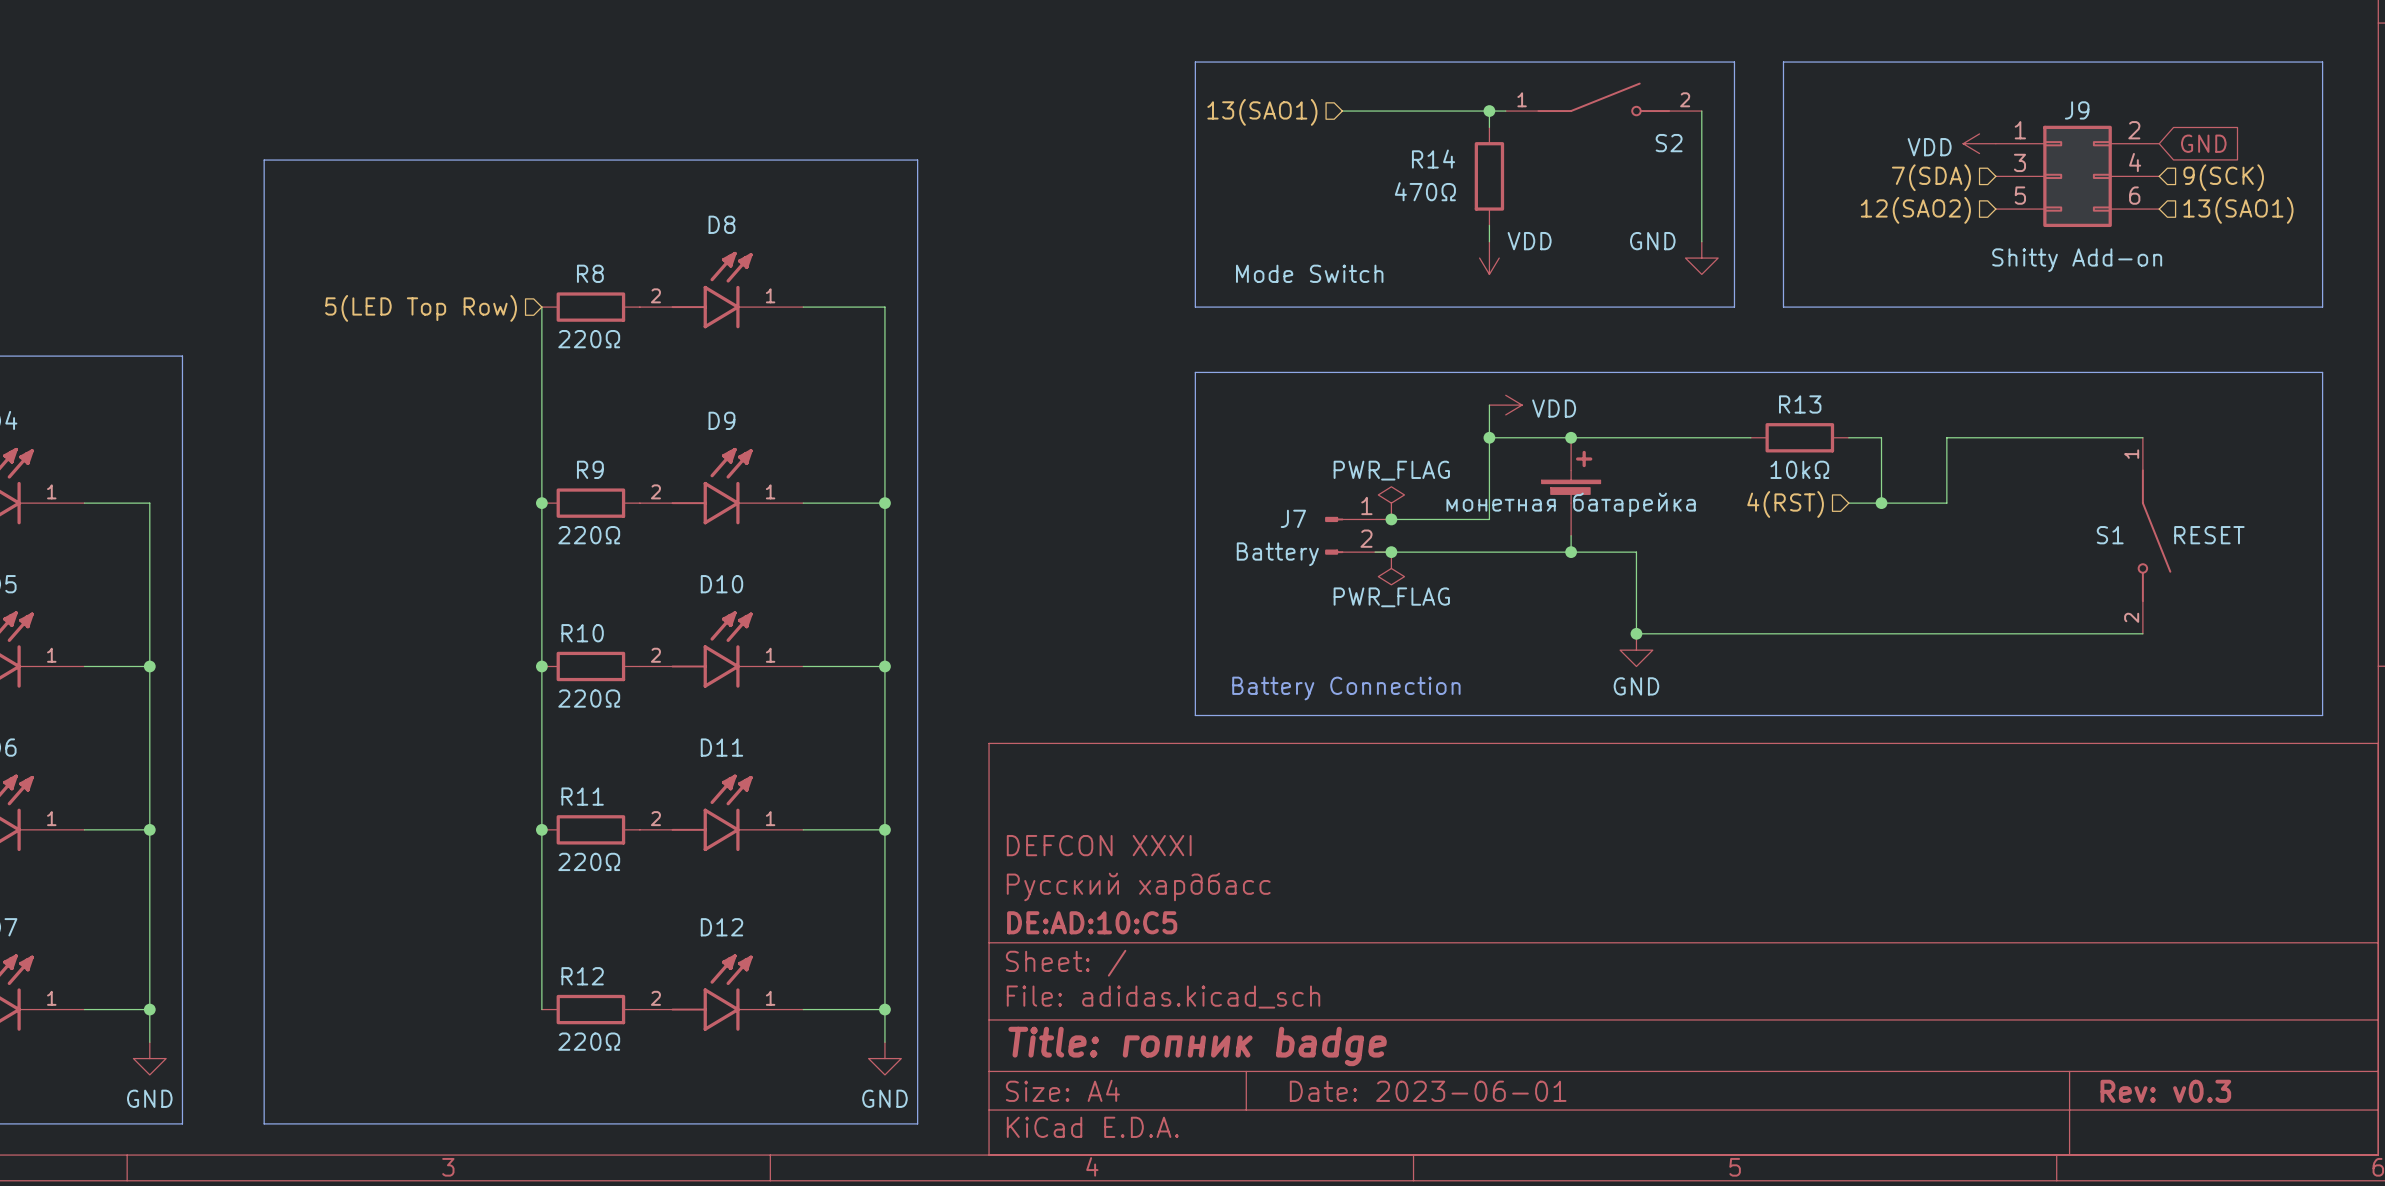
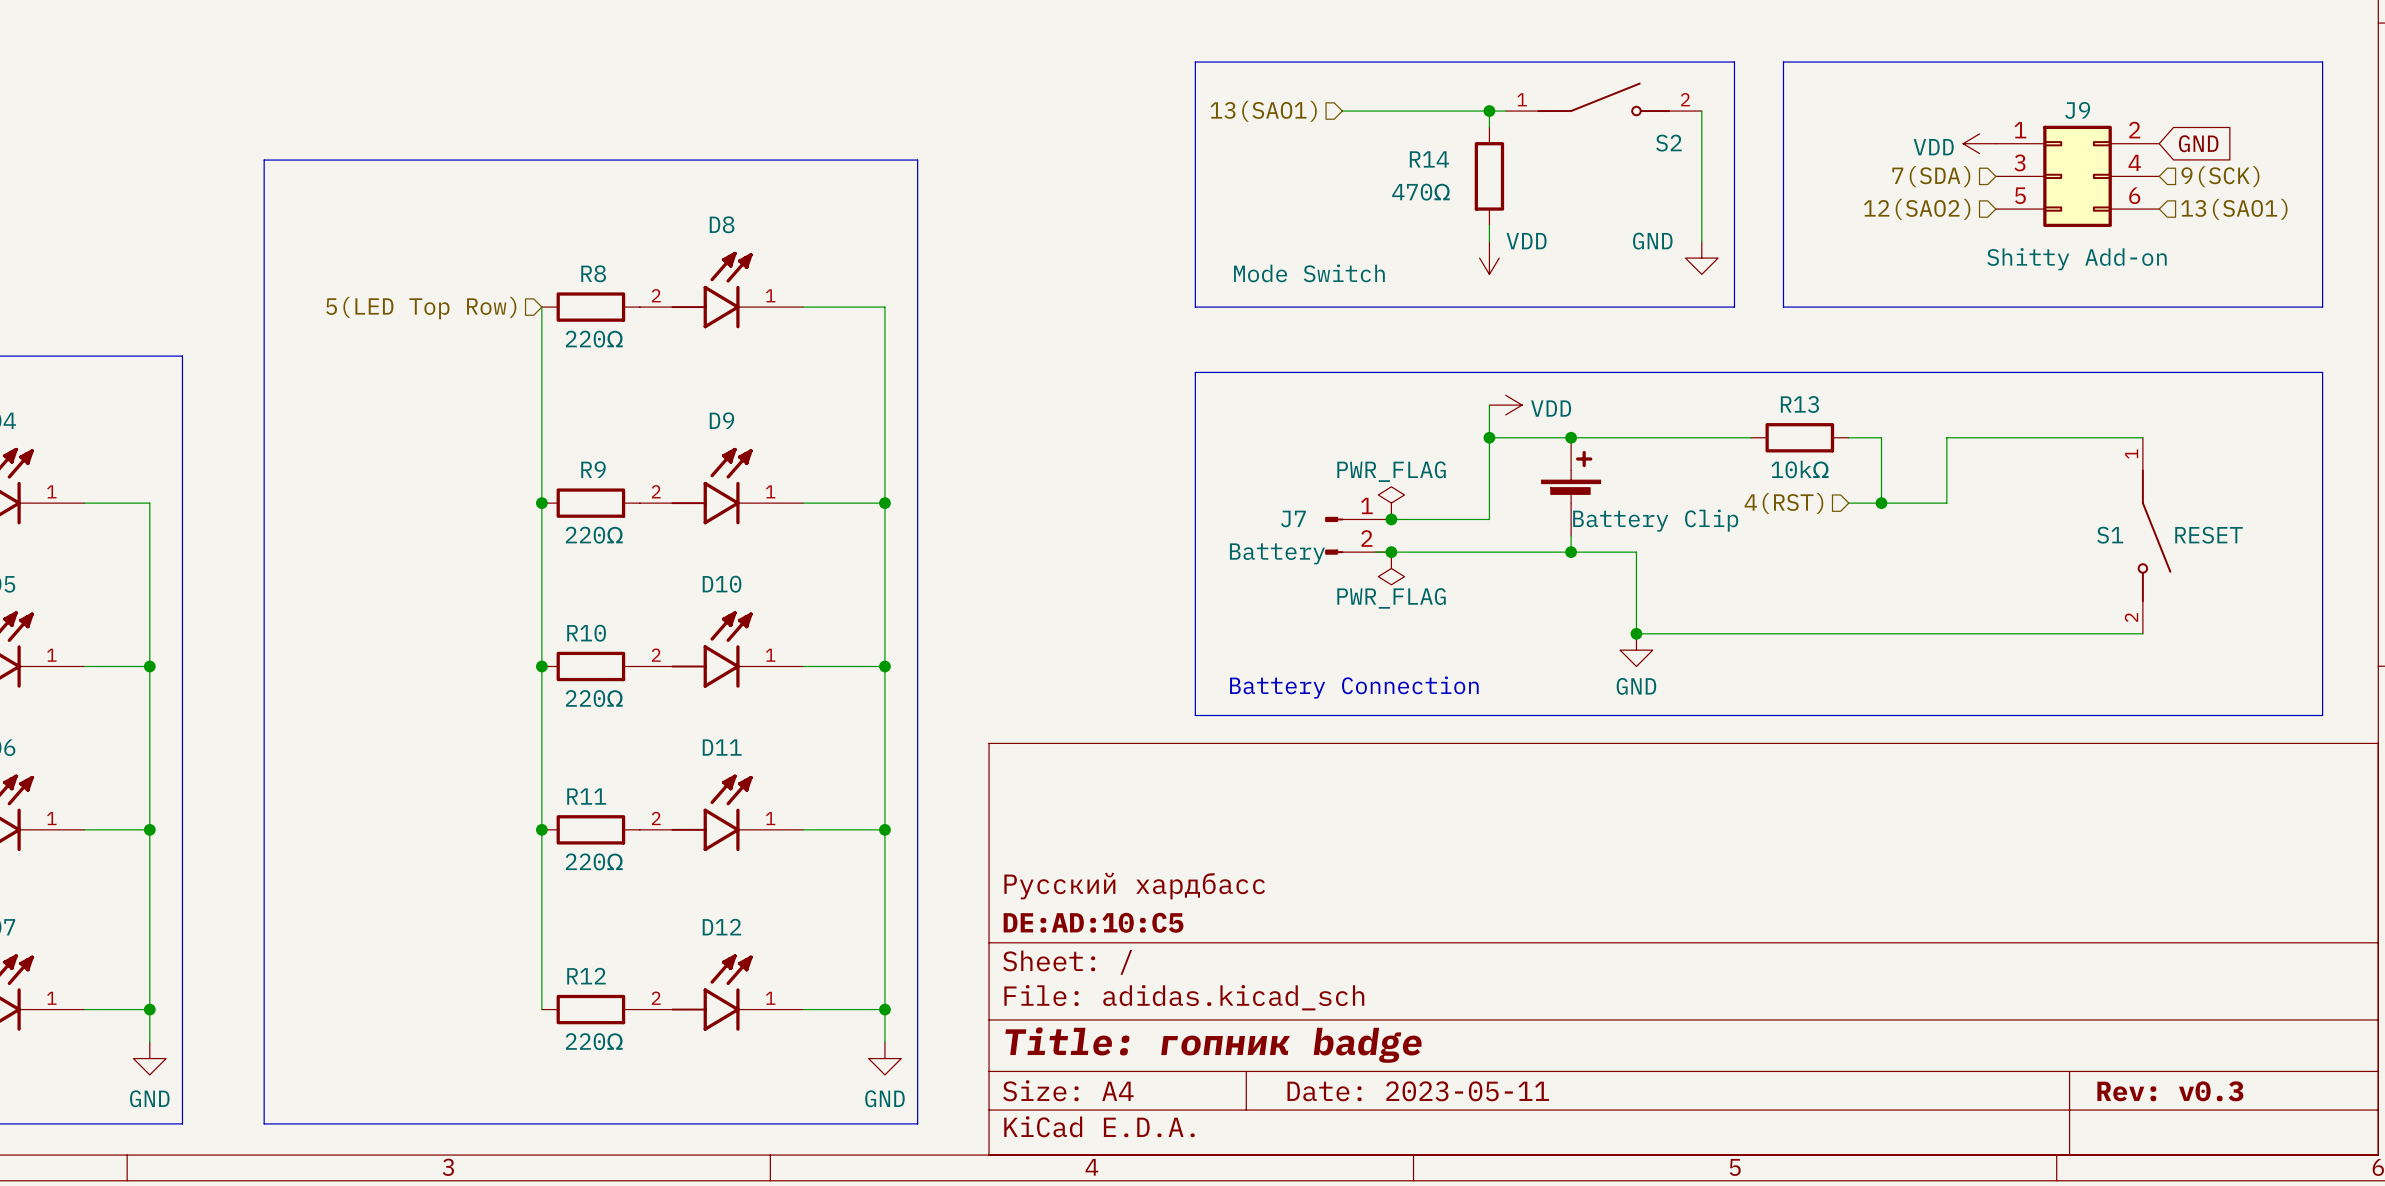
part text: монетная батарейка (1571, 504) -> none
part value: none -> Battery Clip (1655, 520)
title block: DEFCON XXXI (1099, 845) -> none
title block: Date: 2023-06-01 (1428, 1091) -> Date: 2023-05-11 (1418, 1091)

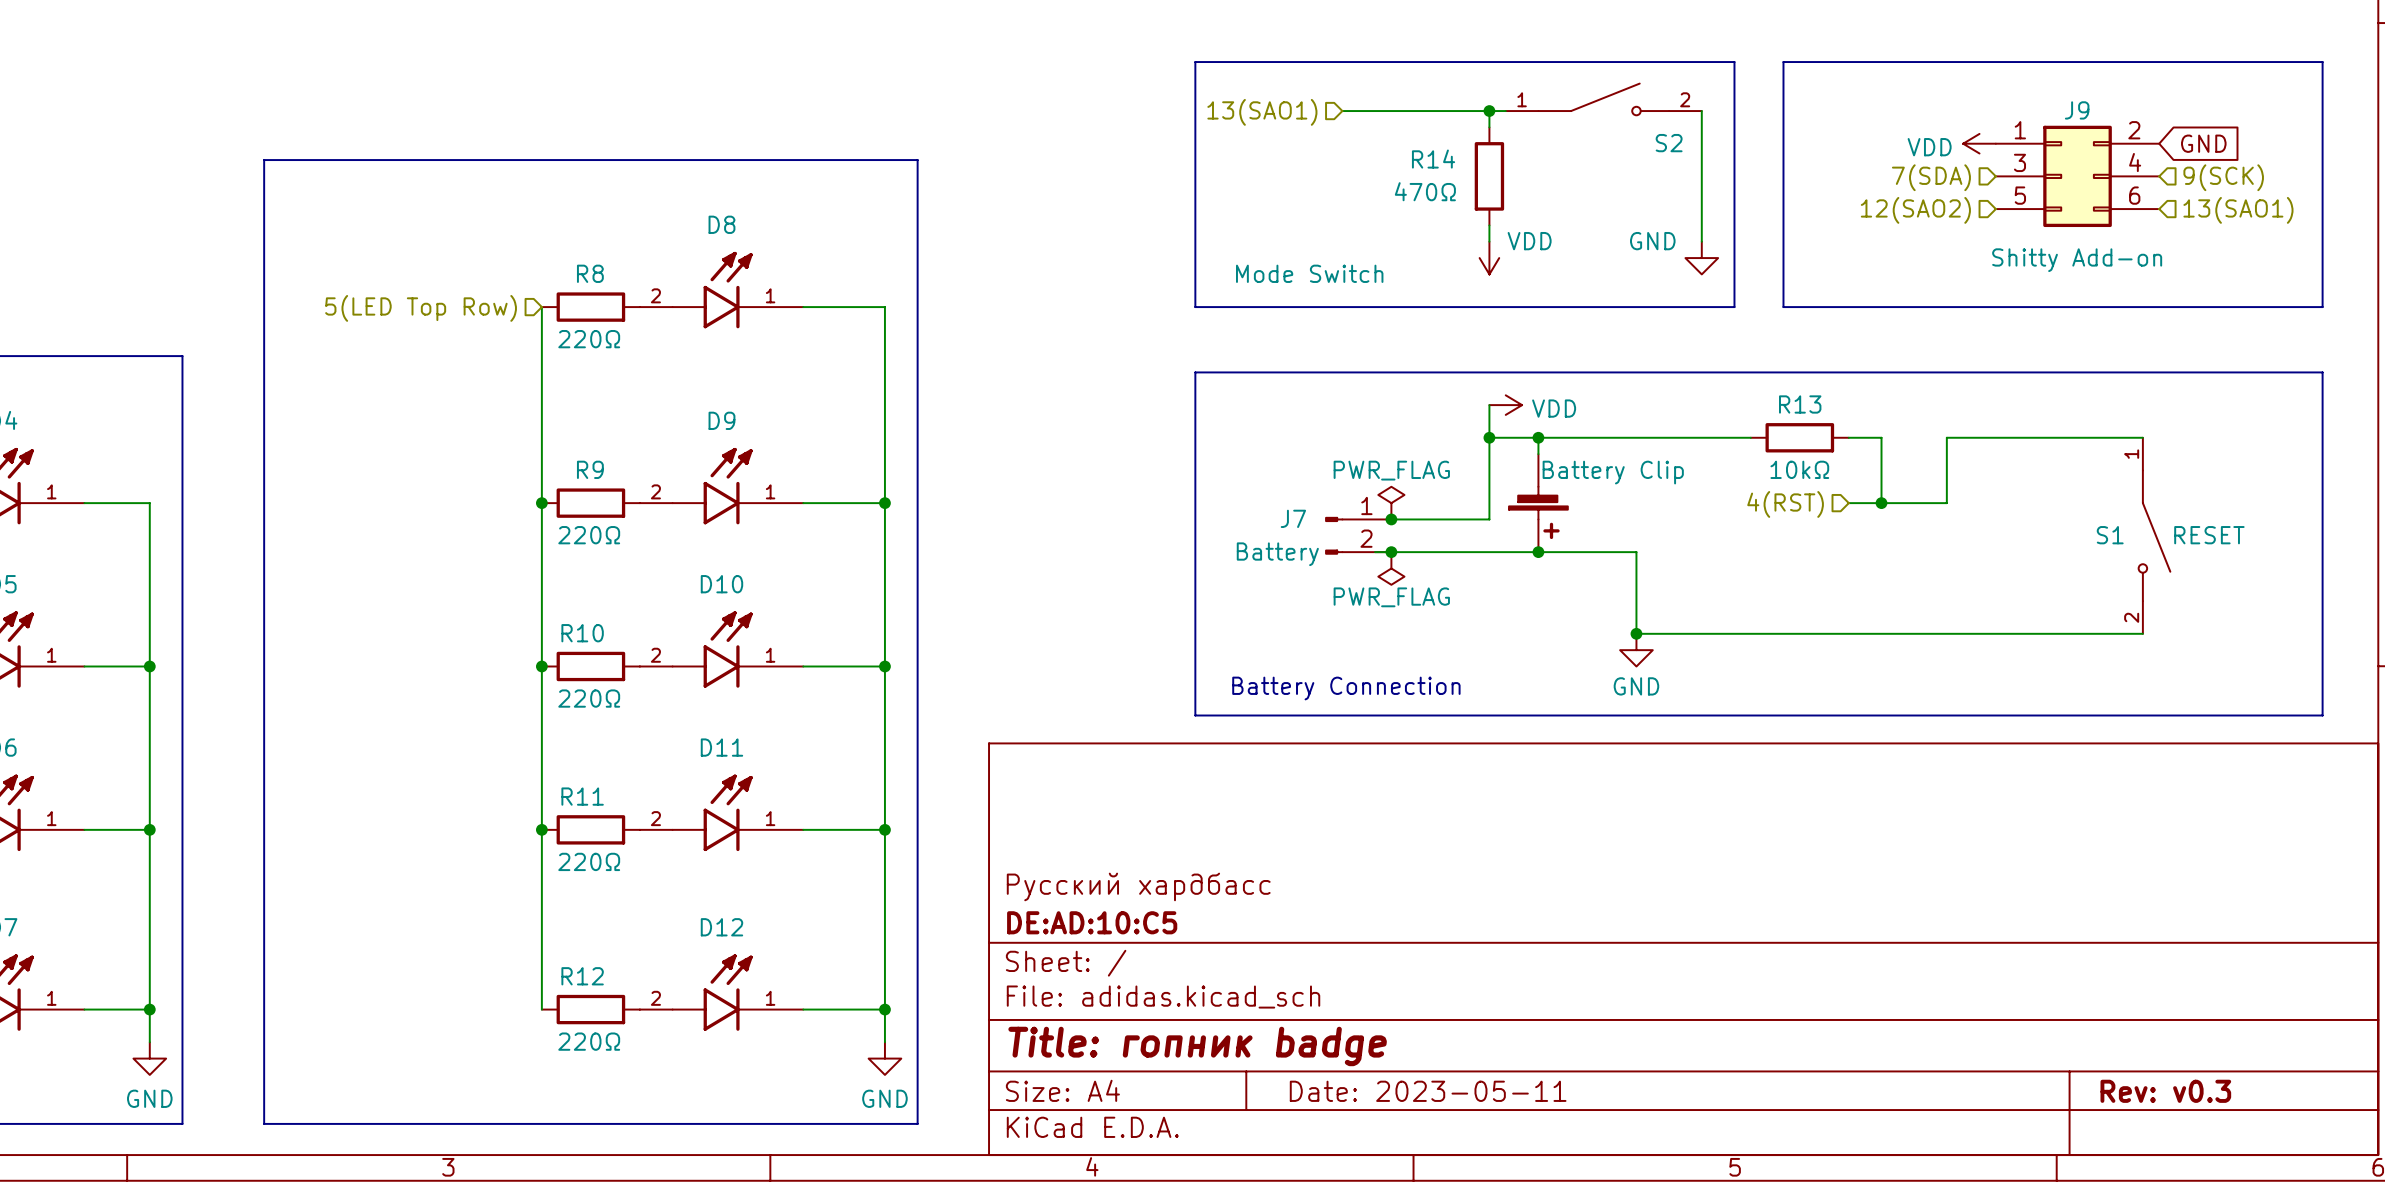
junction position: (1571, 437) -> (1538, 437)
part: Battery Clip (1571, 486) -> none
part: none -> Battery Clip (1538, 503)
wire: (1571, 535) (1571, 552) -> (1538, 437) (1538, 454)
junction position: (1571, 552) -> (1538, 552)

